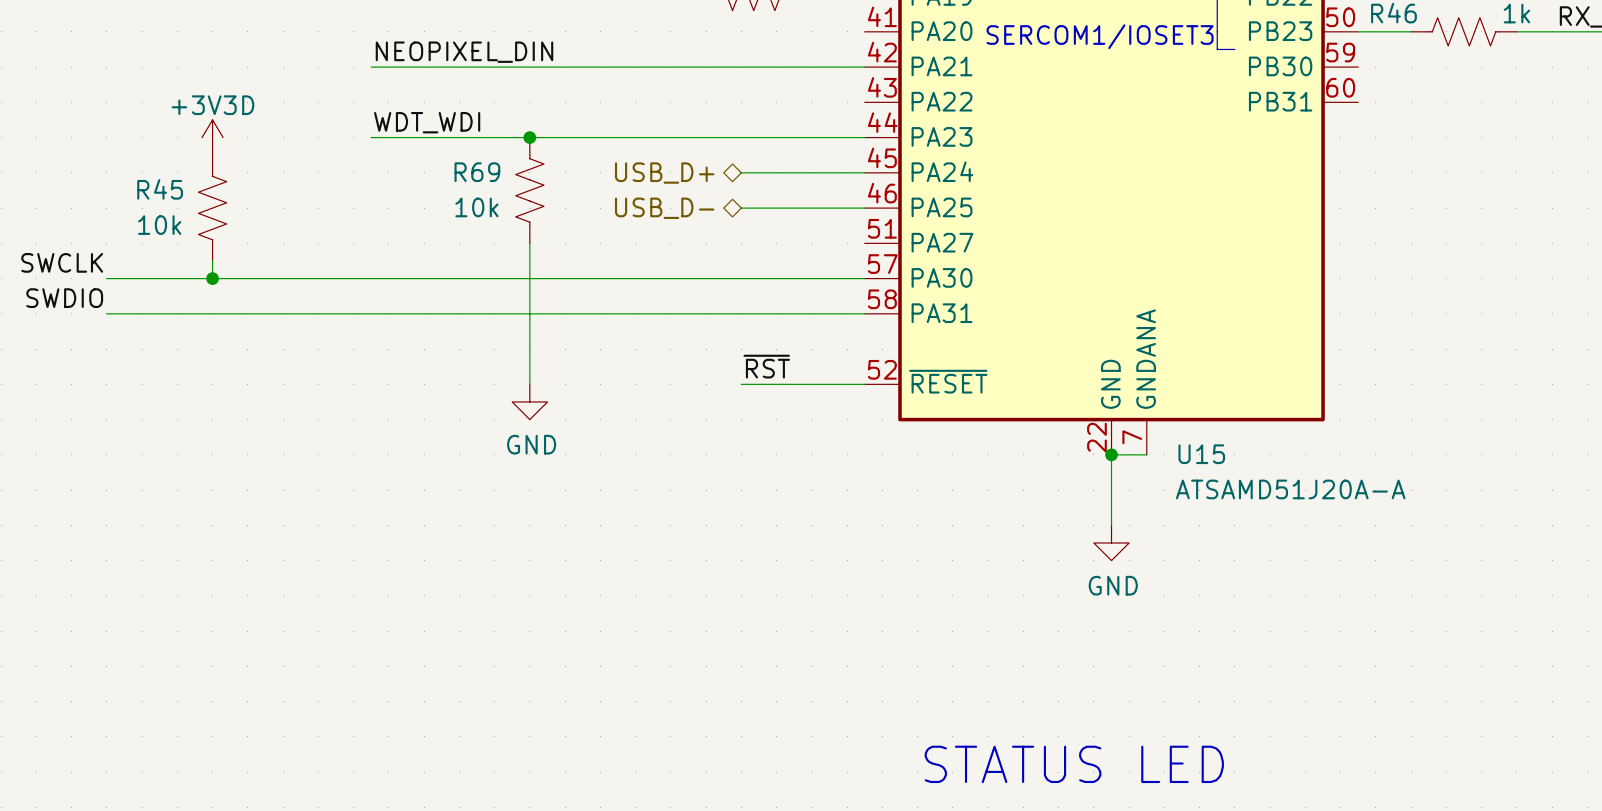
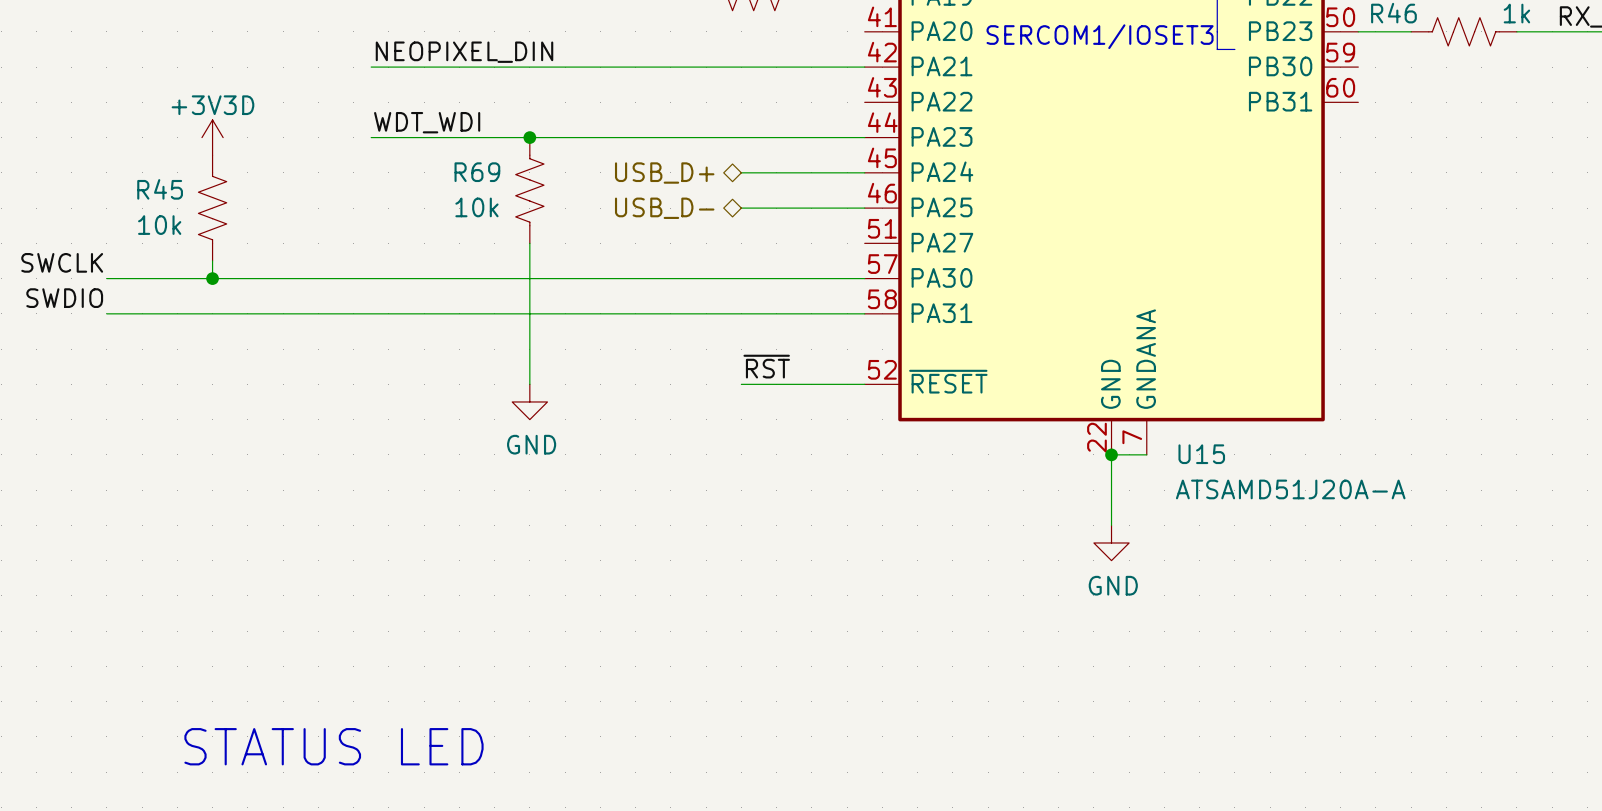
text: none -> STATUS LED (333, 746)
text: STATUS LED (1074, 764) -> none

